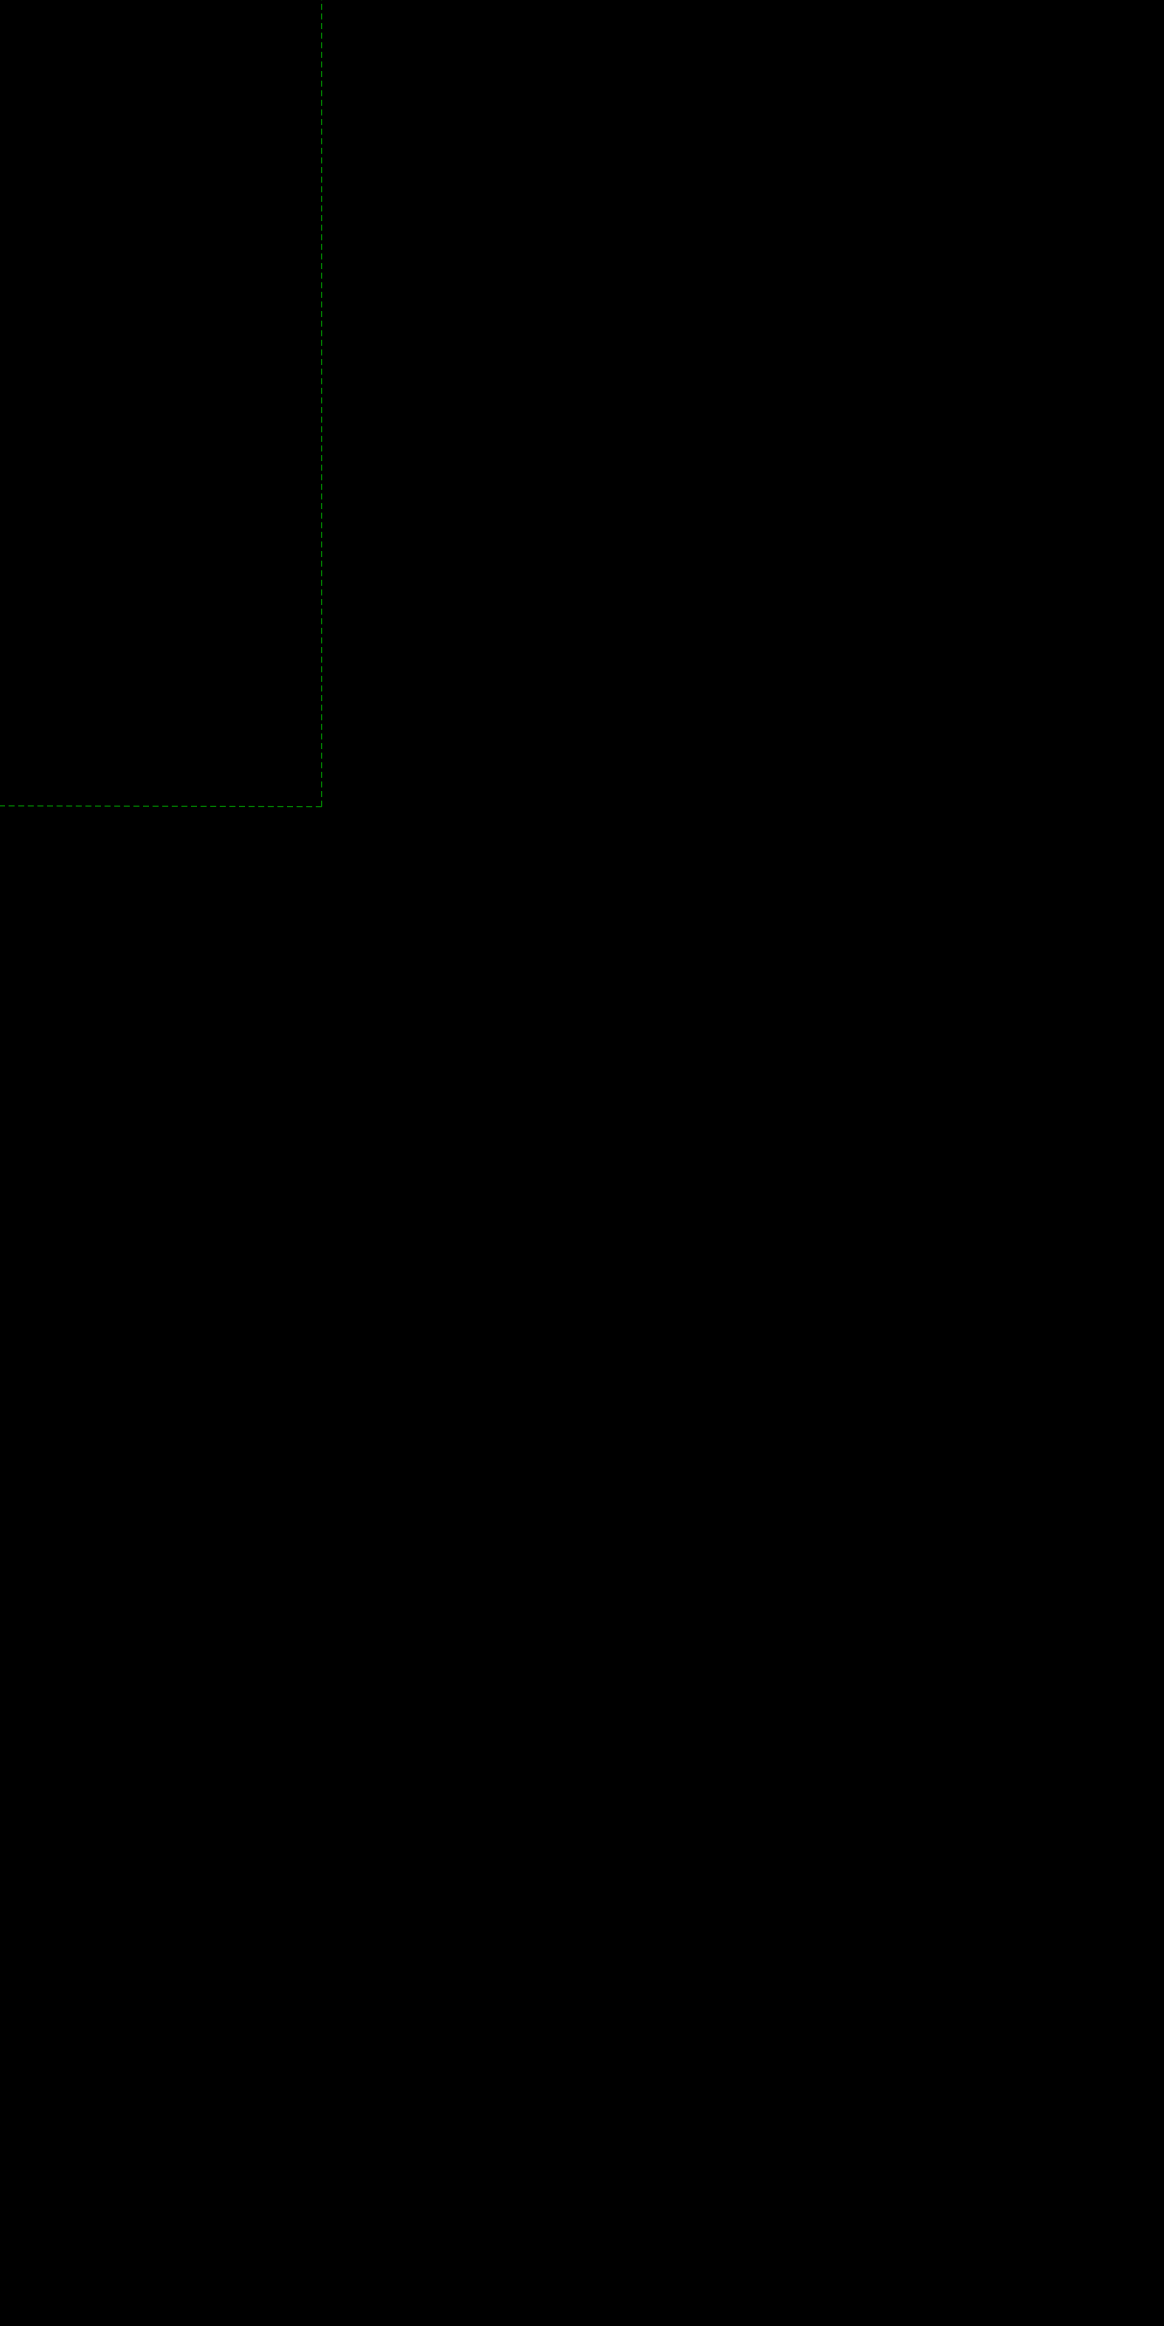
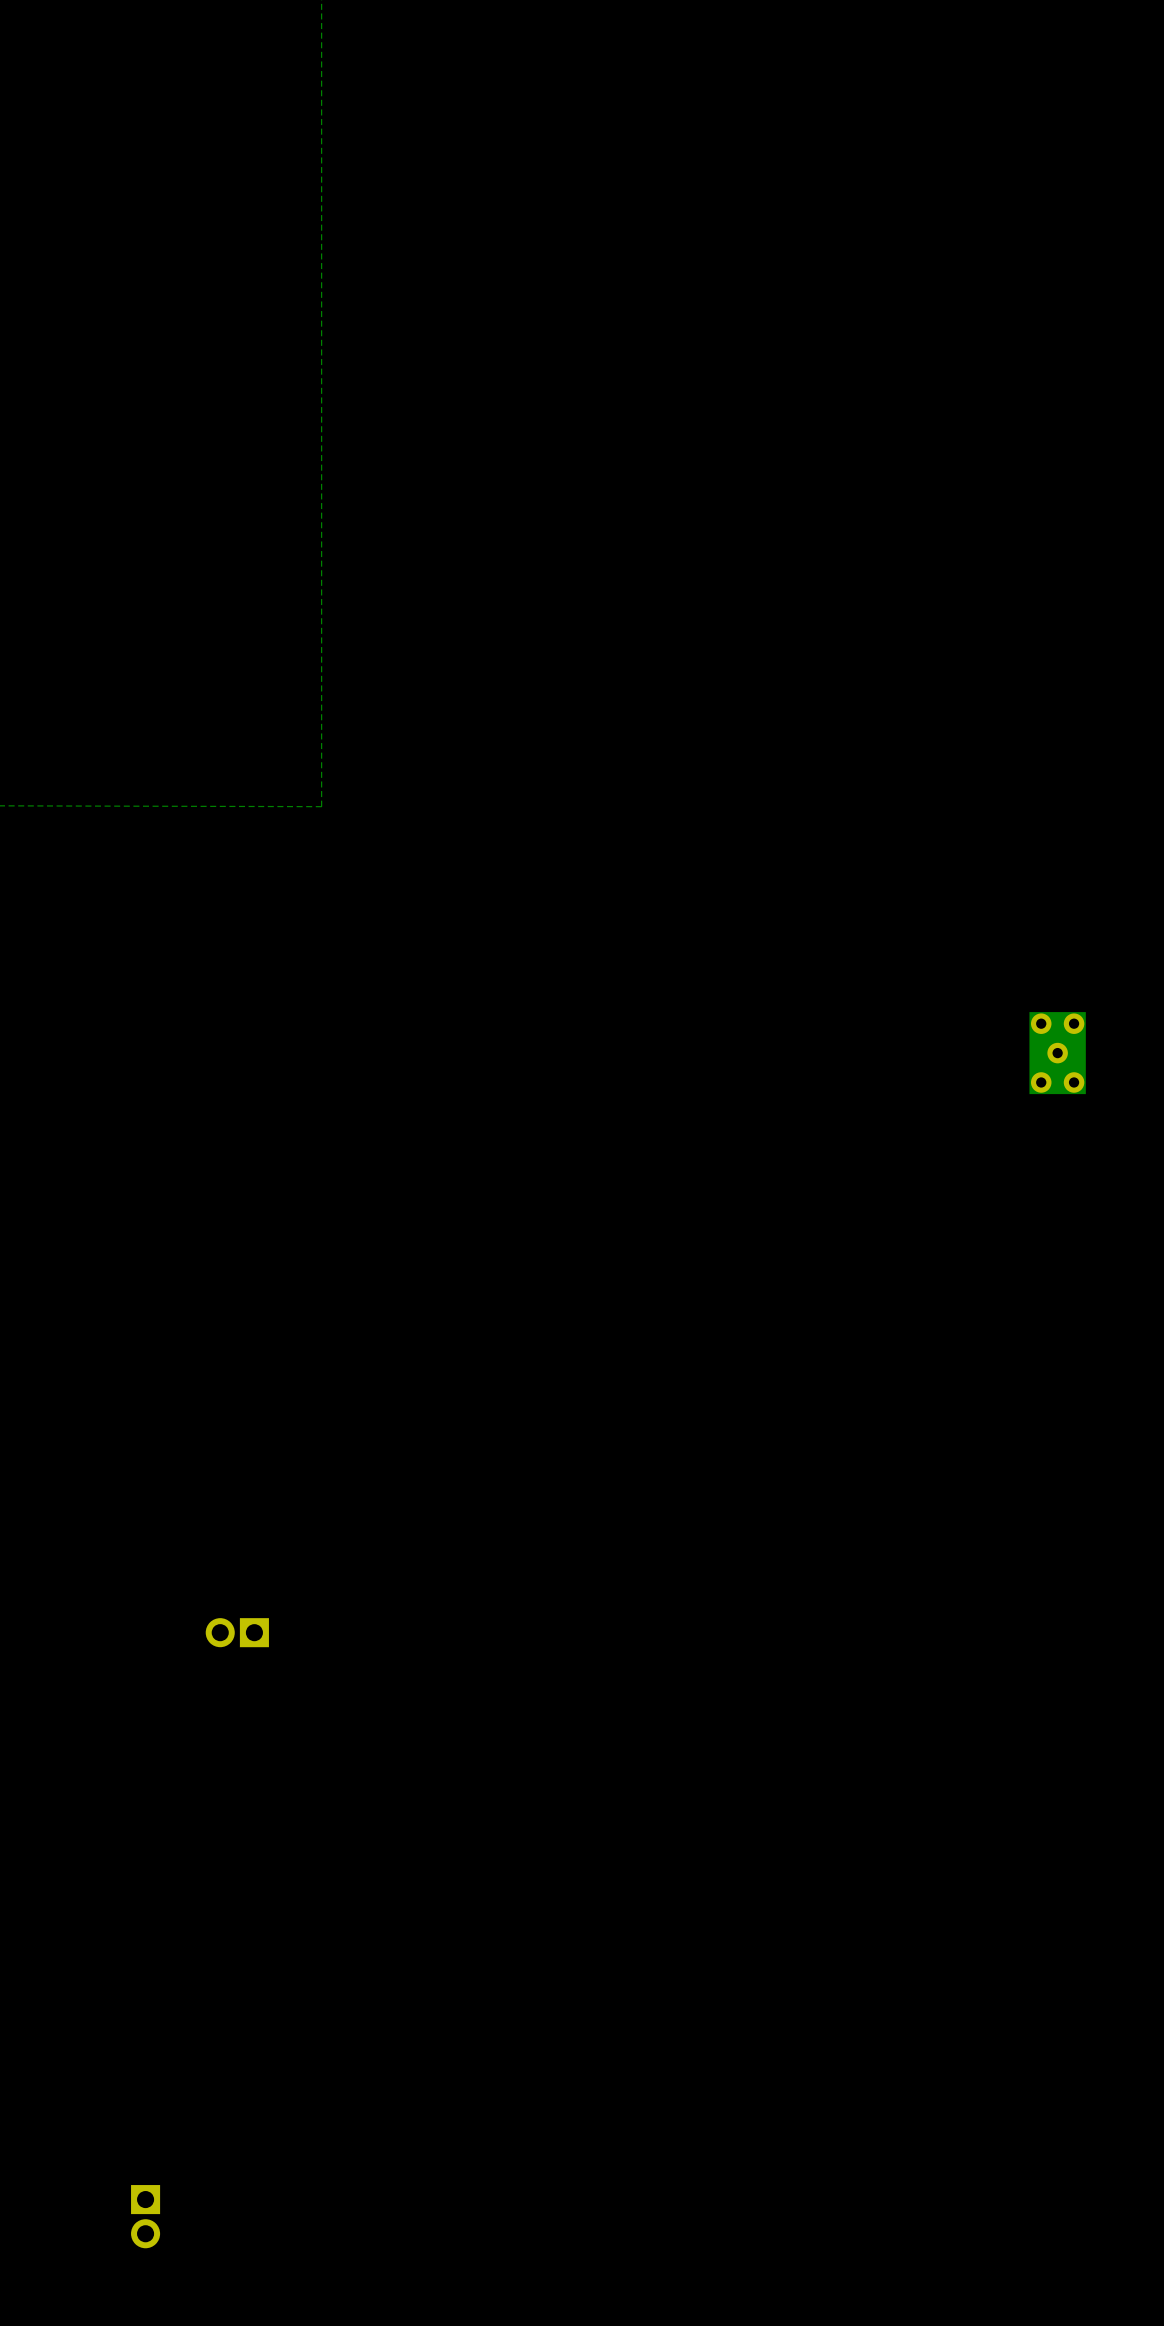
part: none -> (1057, 1053)
part: none -> (237, 1632)
part: none -> (145, 2216)

